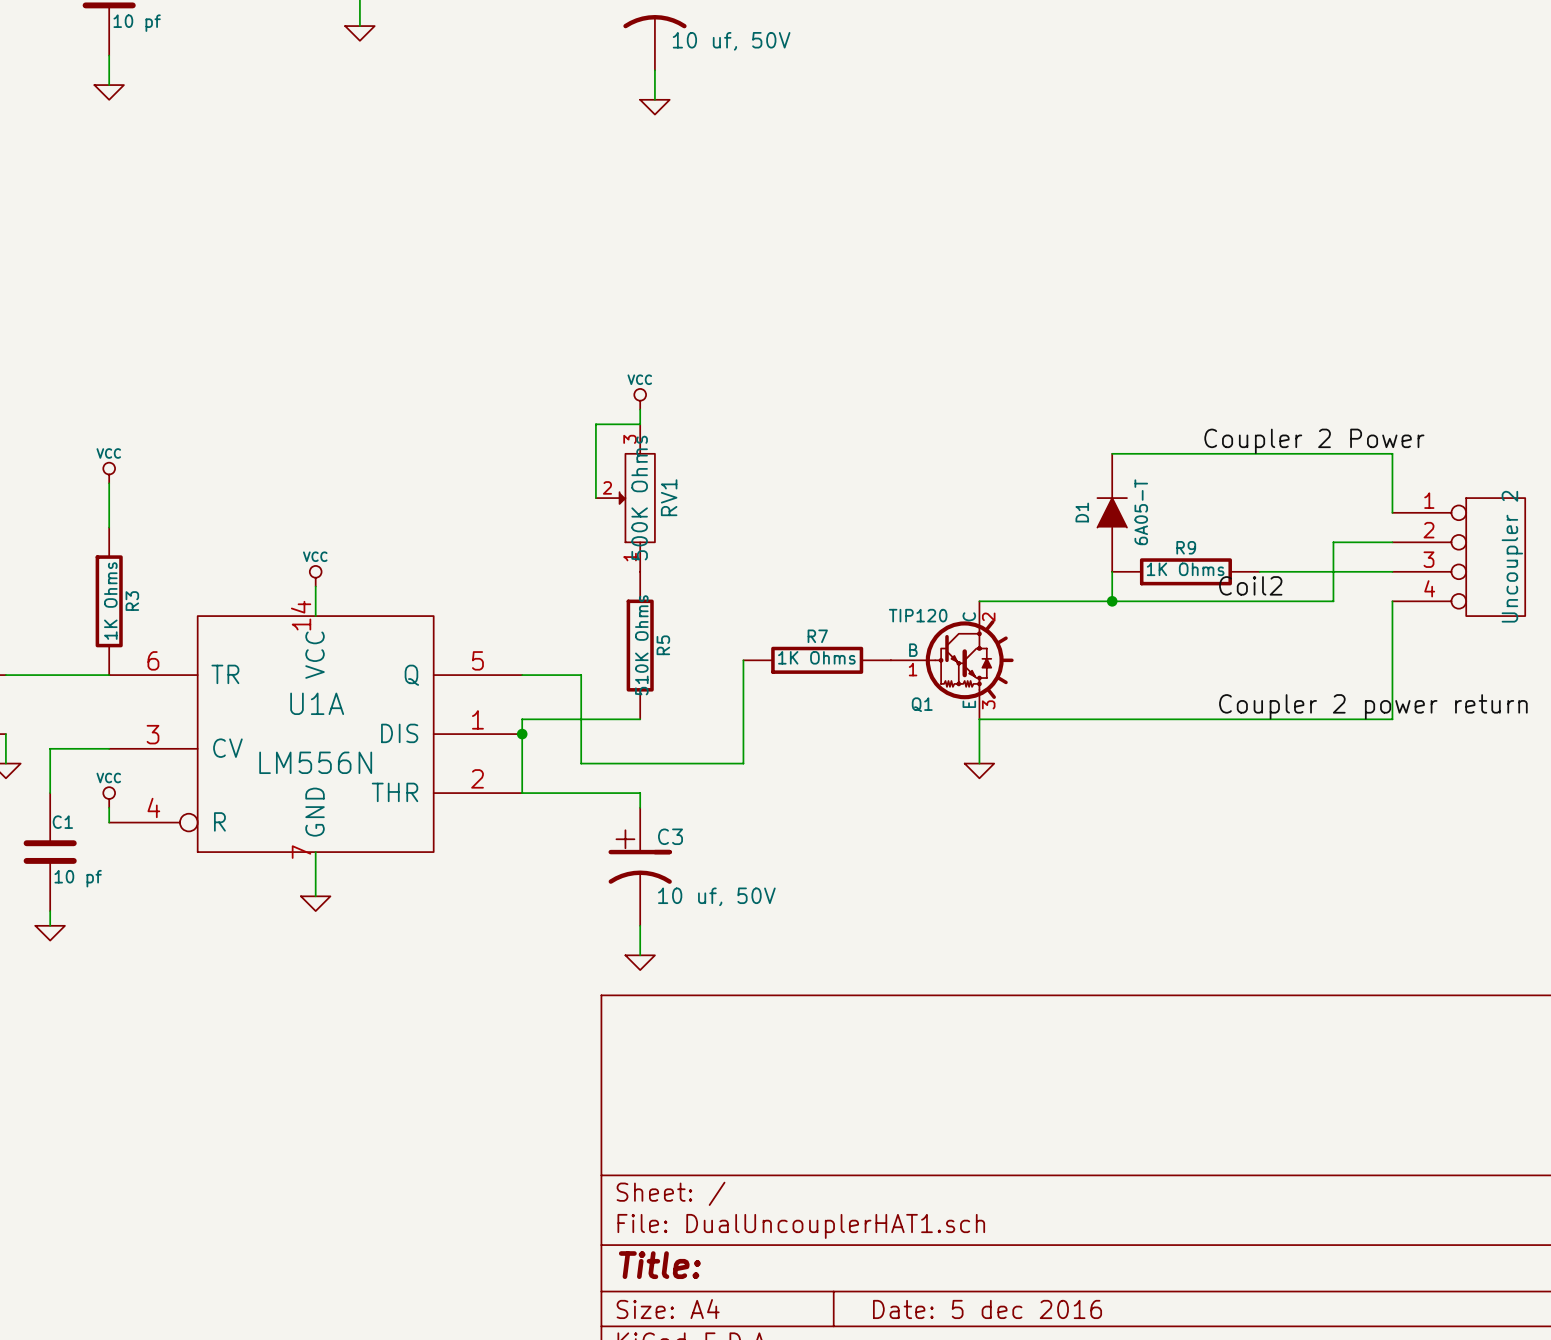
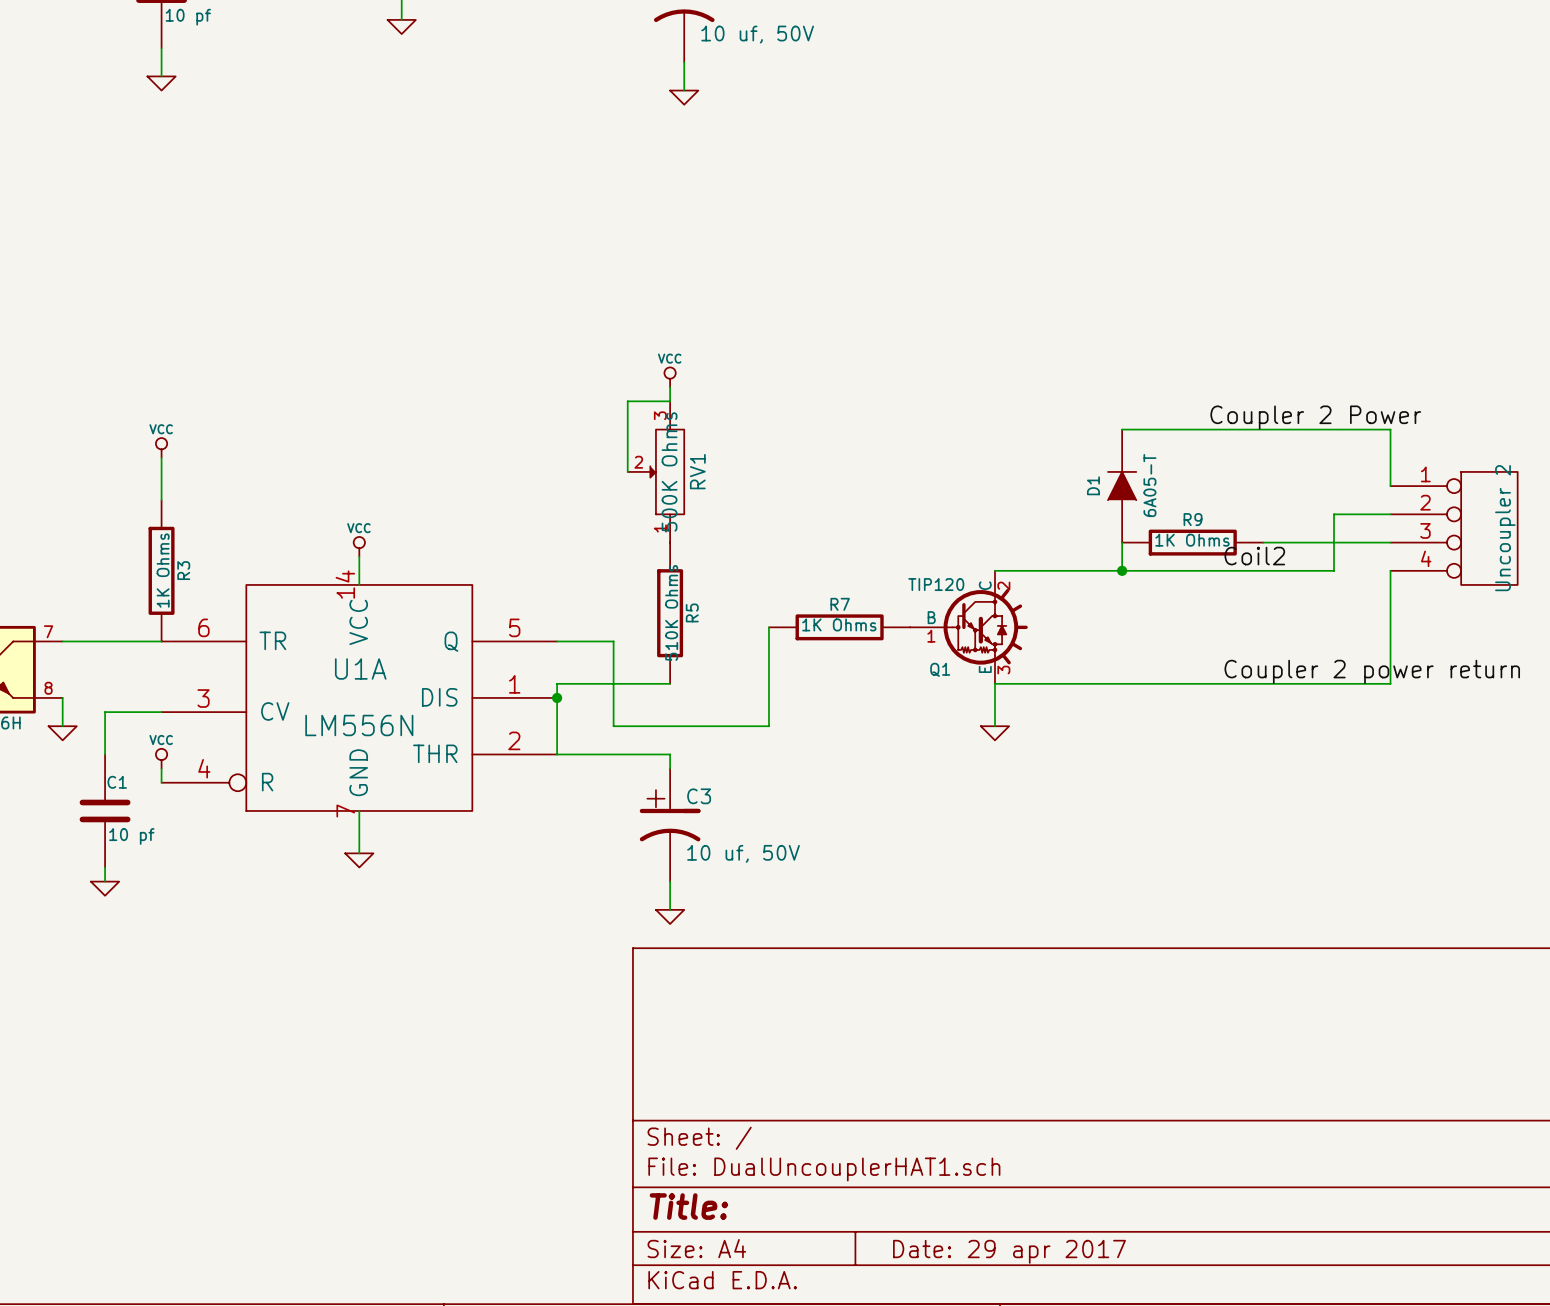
title block: Date: 5 dec 2016 (987, 1309) -> Date: 29 apr 2017 (1009, 1251)

